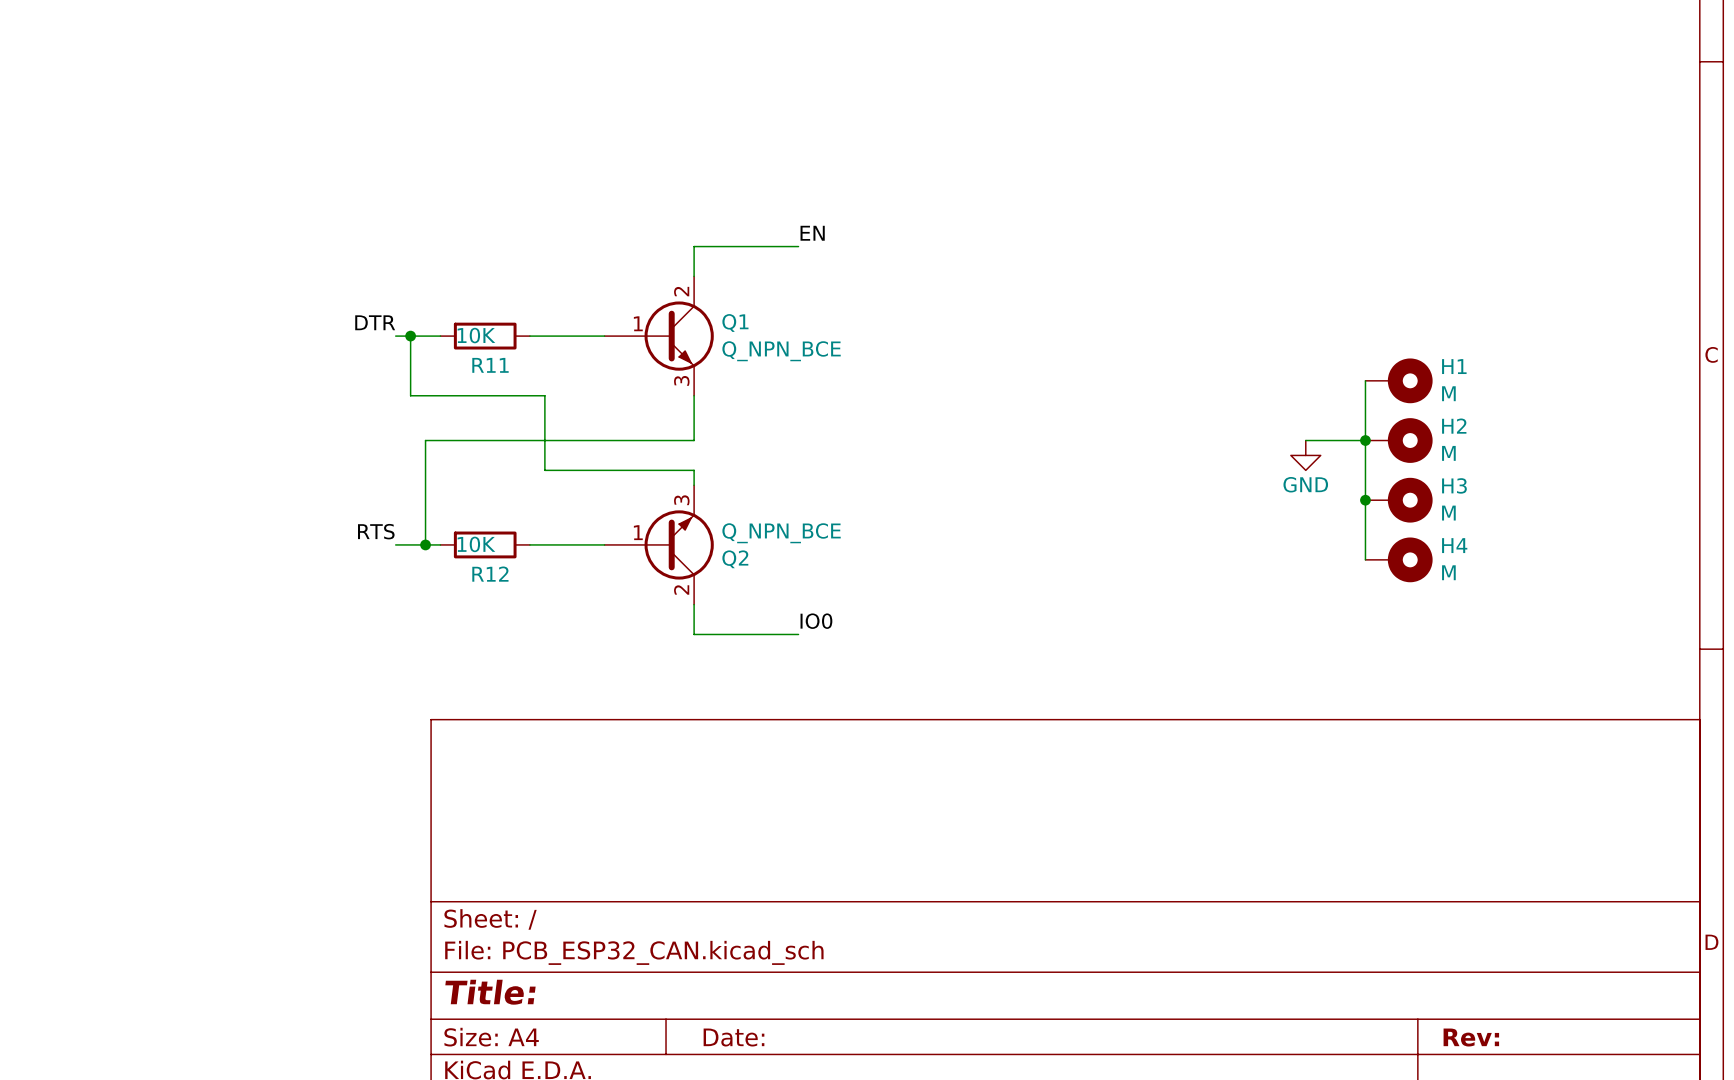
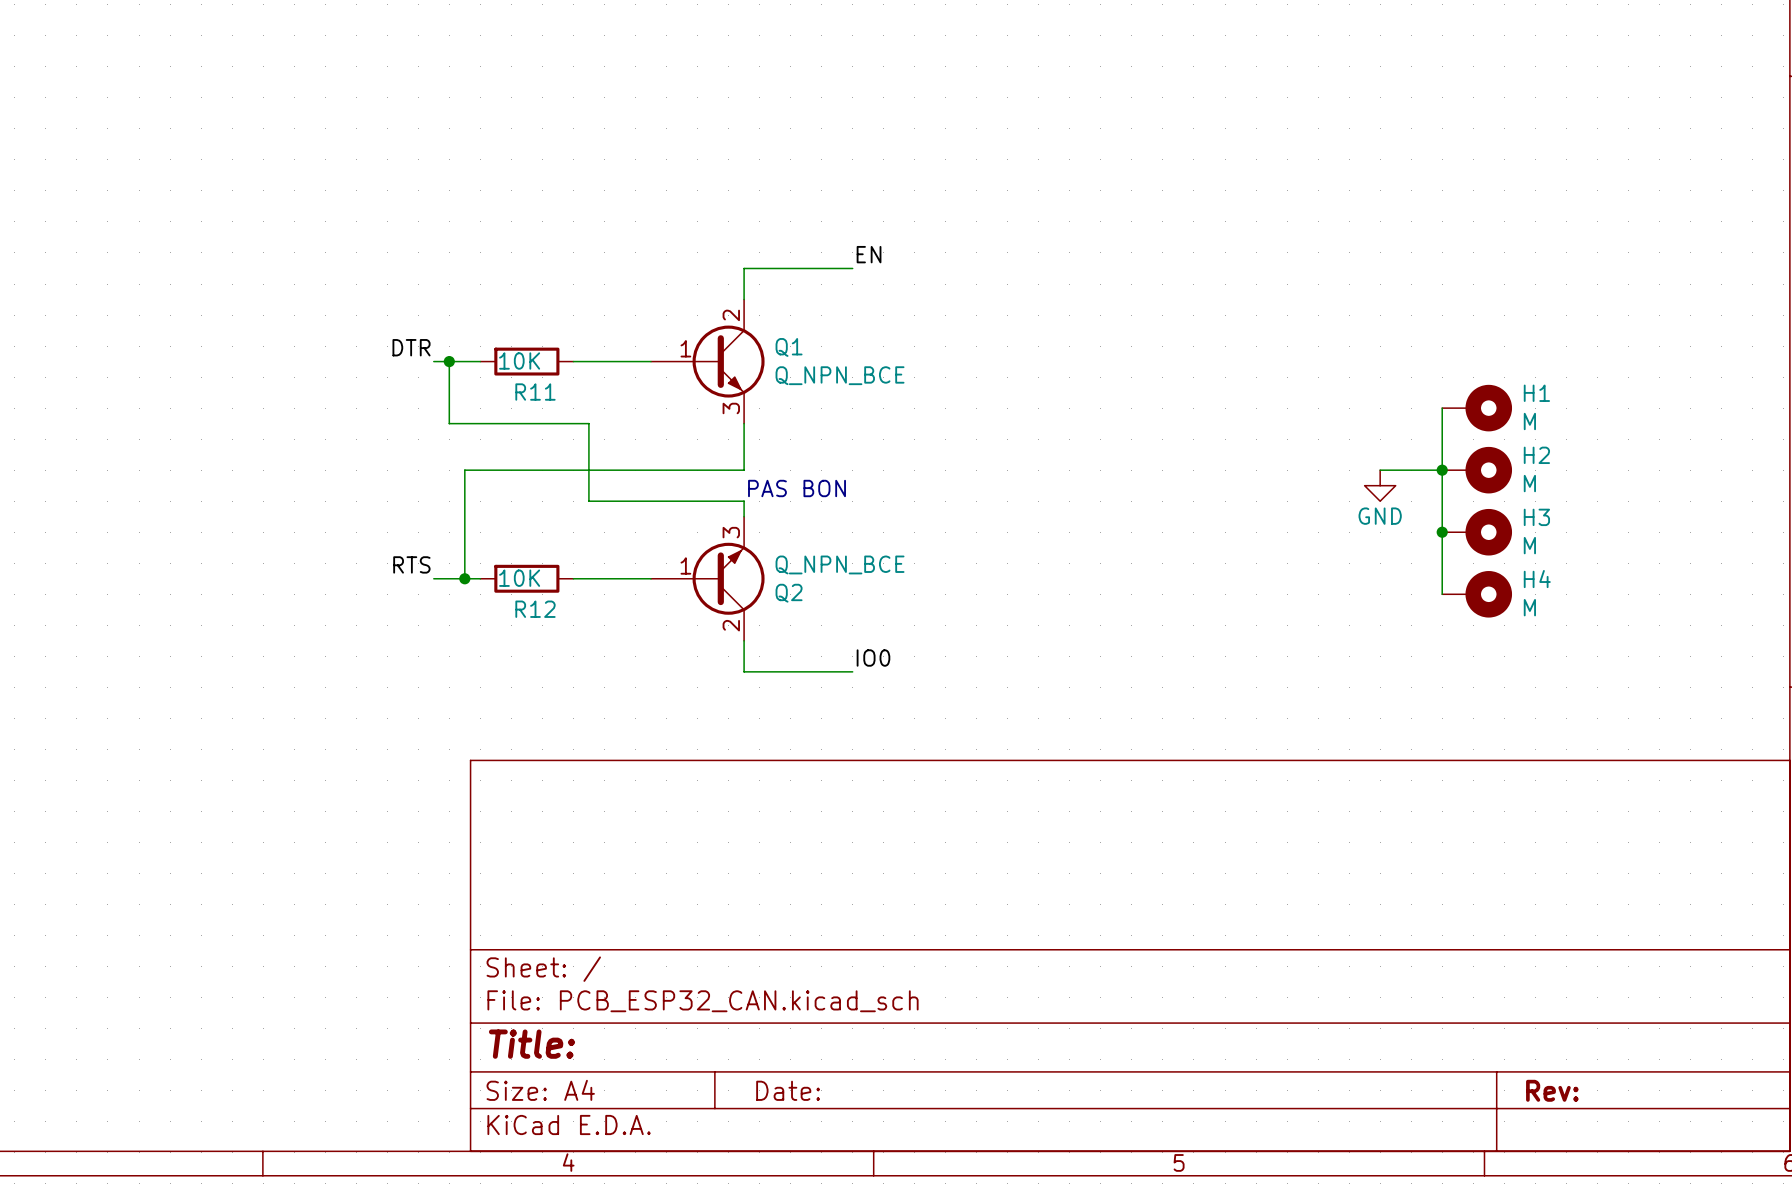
text: none -> PAS BON (797, 488)

